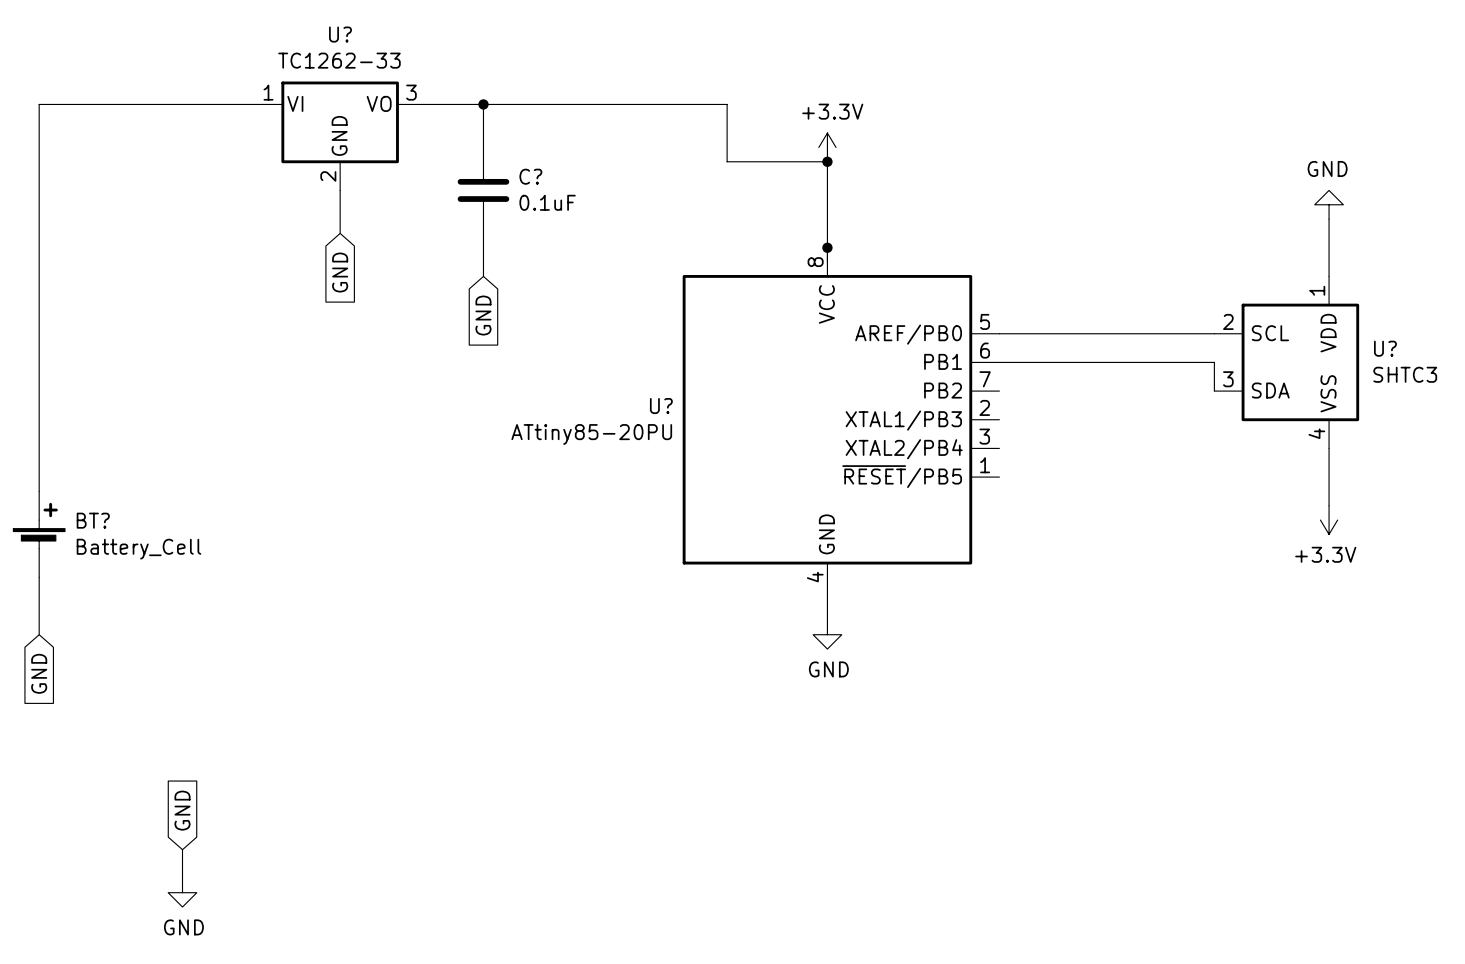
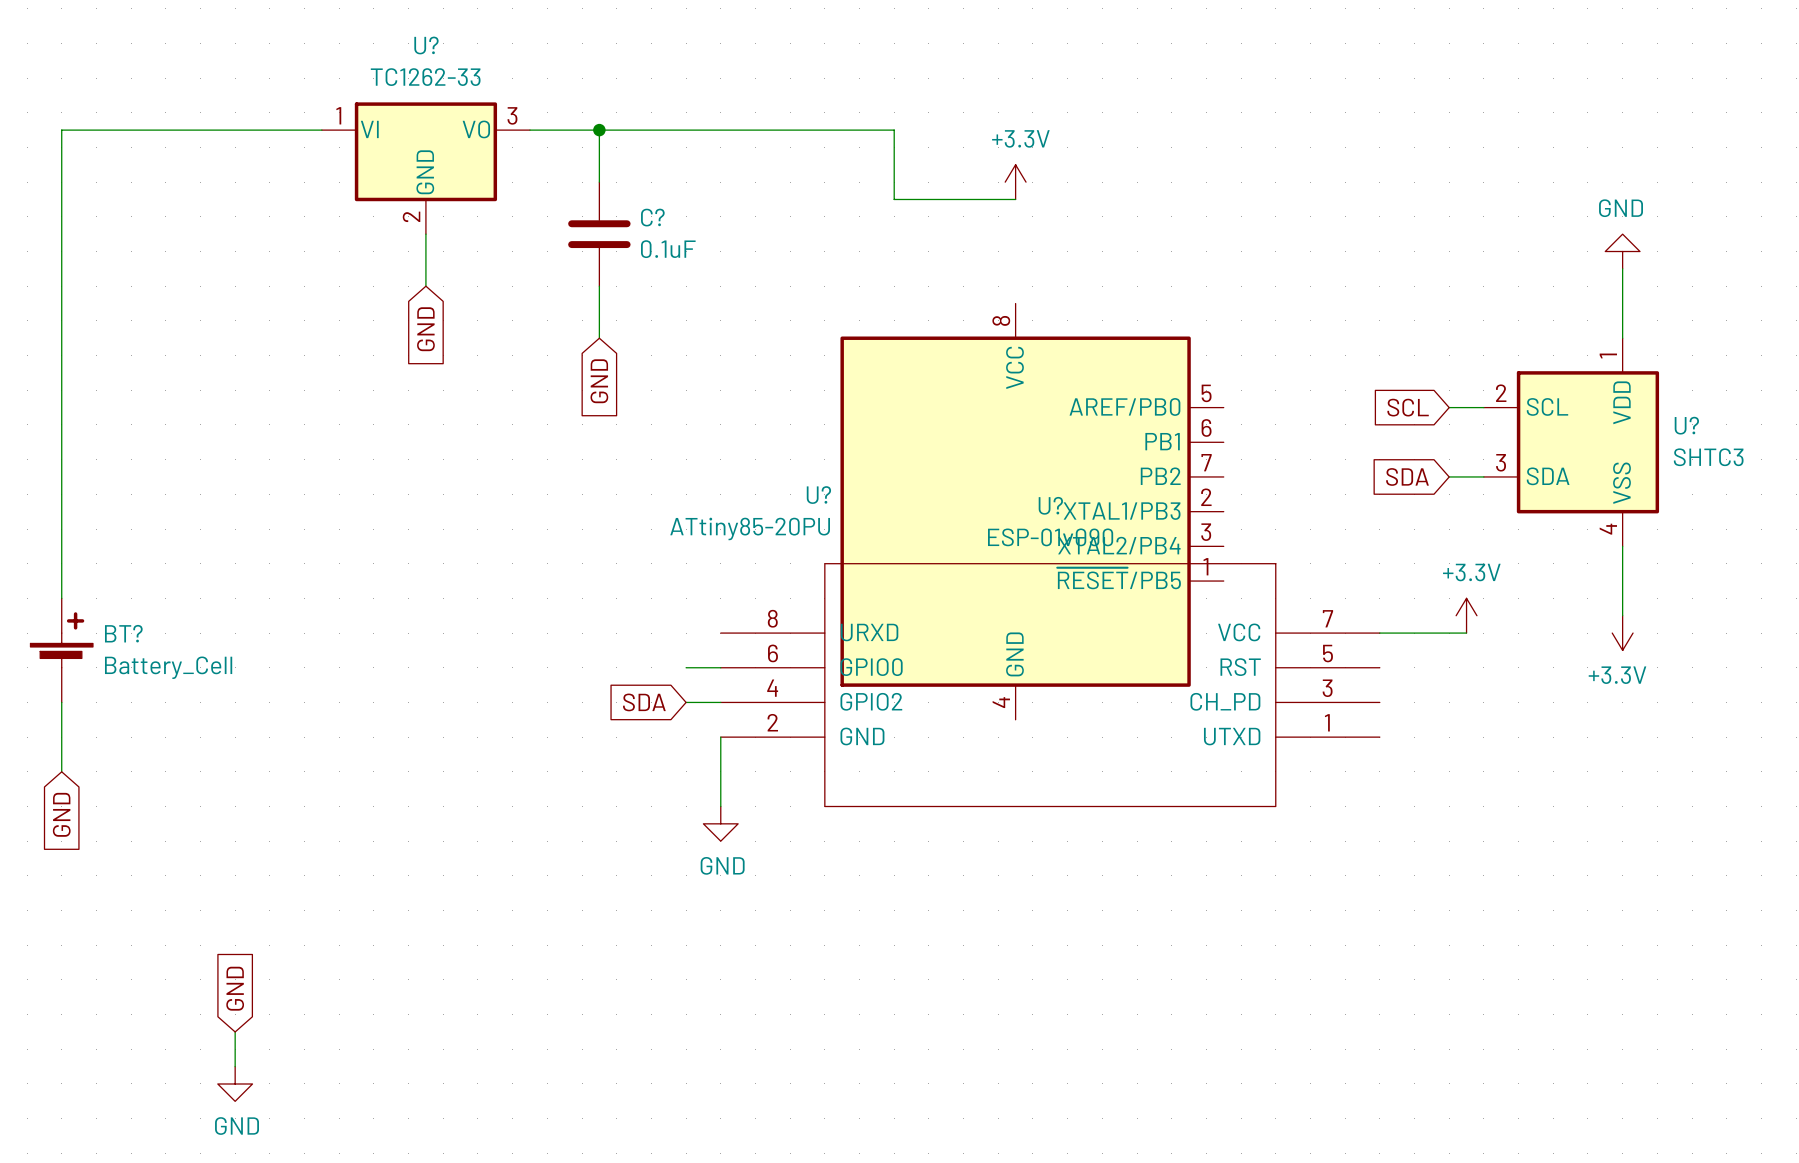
wire: (827, 161) (827, 262) -> none
junction: (827, 161) -> none
junction: (827, 247) -> none
wire: (999, 333) (1185, 333) -> none
global label: none -> SCL (1408, 407)
wire: (999, 362) (1214, 362) (1214, 391) -> (1449, 476) (1483, 476)
global label: none -> SDA (1407, 476)
power symbol: none -> +3.3V (1466, 615)
wire: none -> (1379, 633) (1466, 633)
wire: none -> (686, 667) (720, 667)
U?: none -> ESP-01v090 (1050, 685)
global label: none -> SDA (644, 702)
wire: none -> (686, 702) (720, 702)
wire: (827, 591) (827, 620) -> none
wire: none -> (720, 737) (720, 806)
power symbol position: GND (827, 634) -> GND (720, 823)

